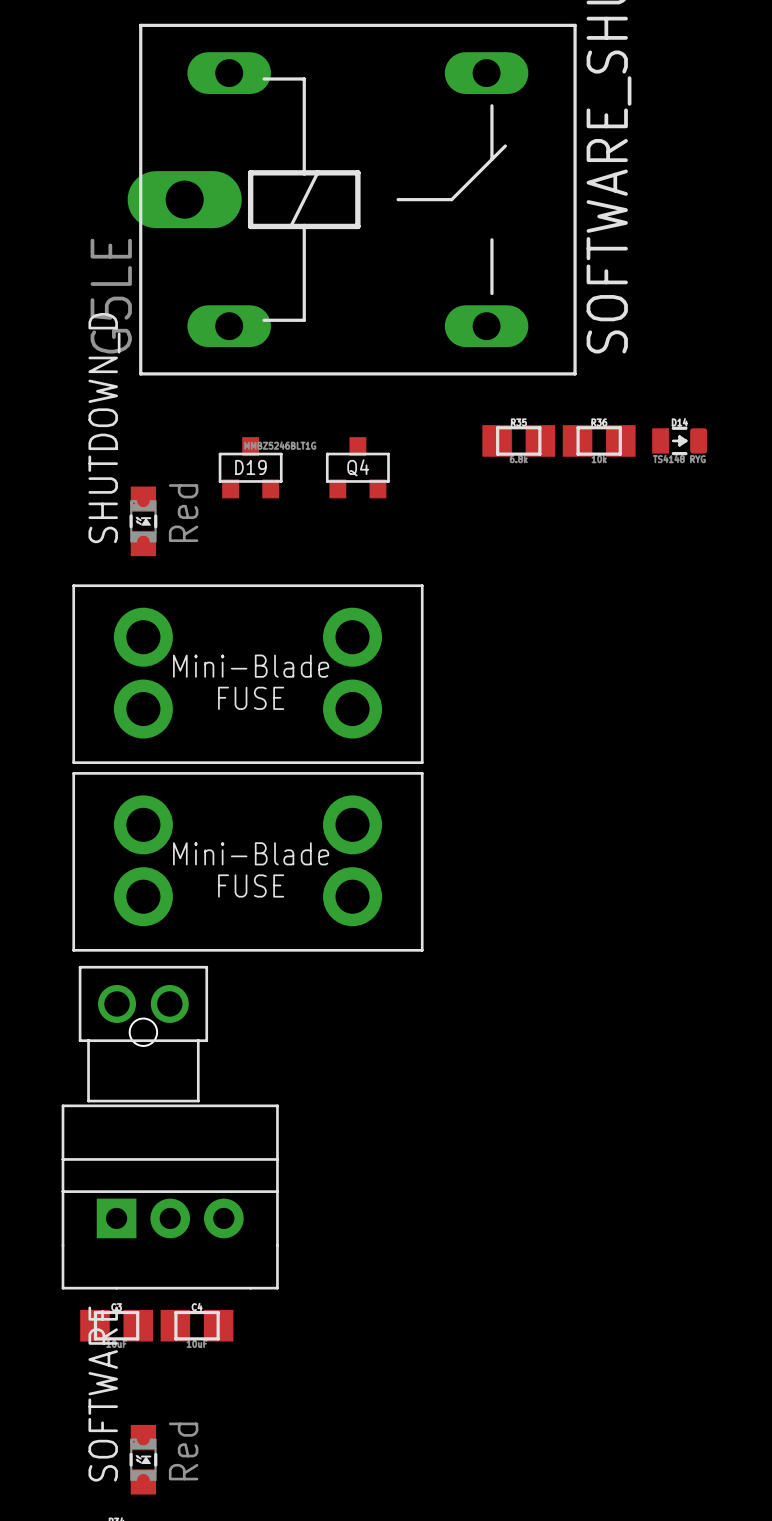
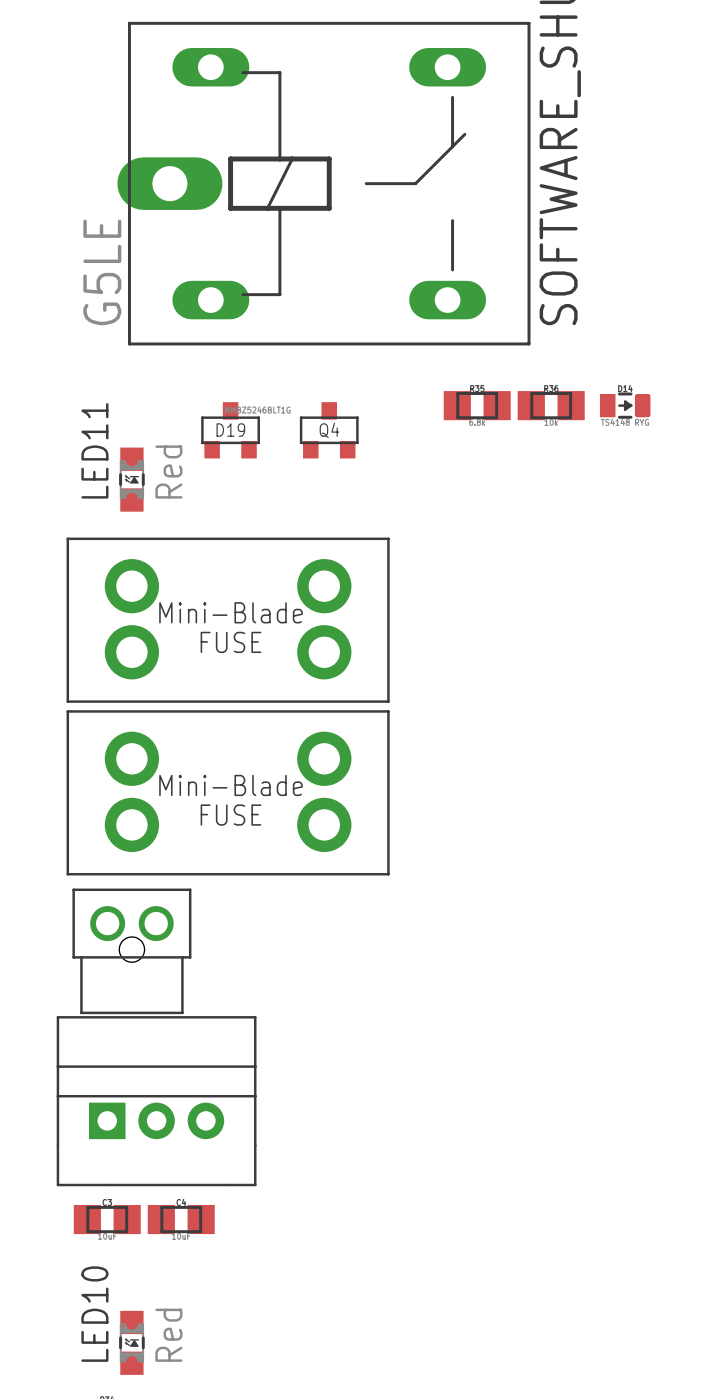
SHUTDOWN_D name: SHUTDOWN_D (104, 428) -> LED11 (94, 450)
SOFTWARE name: SOFTWARE (103, 1394) -> LED10 (94, 1314)

